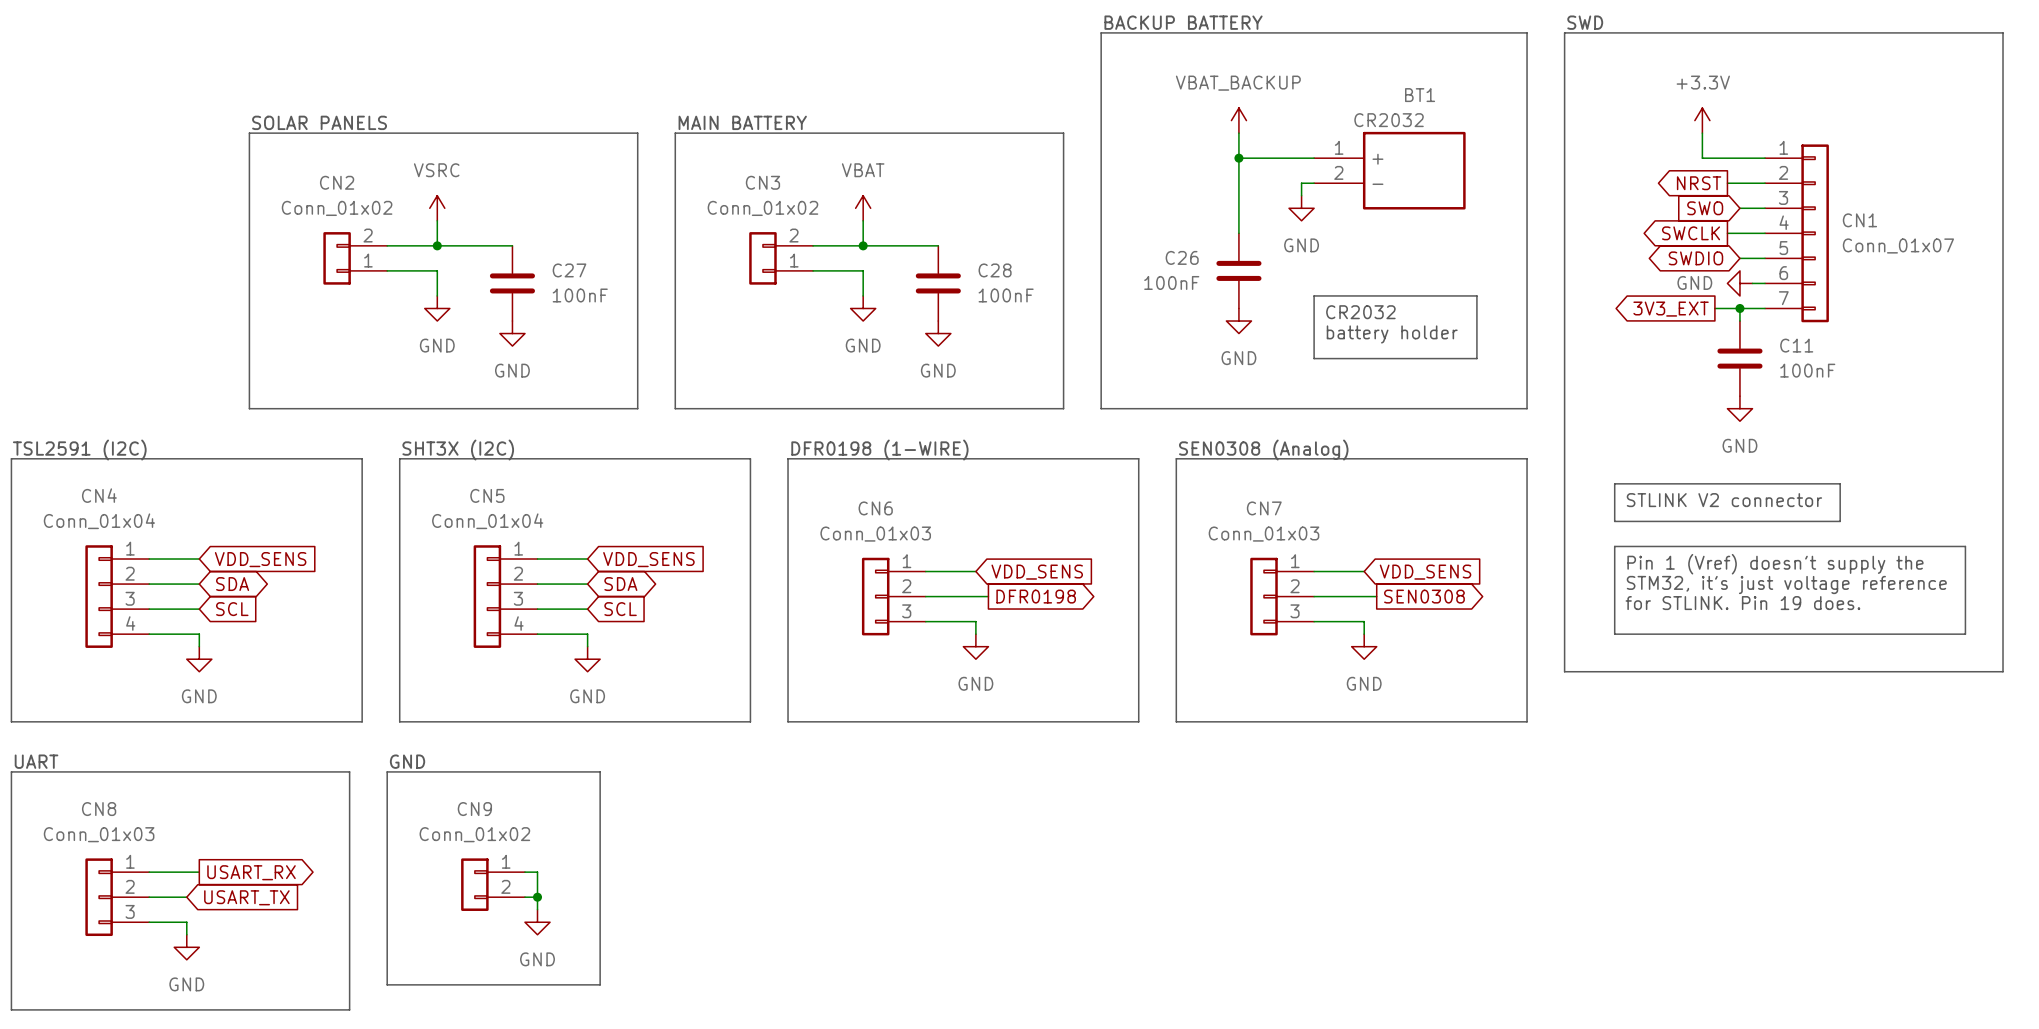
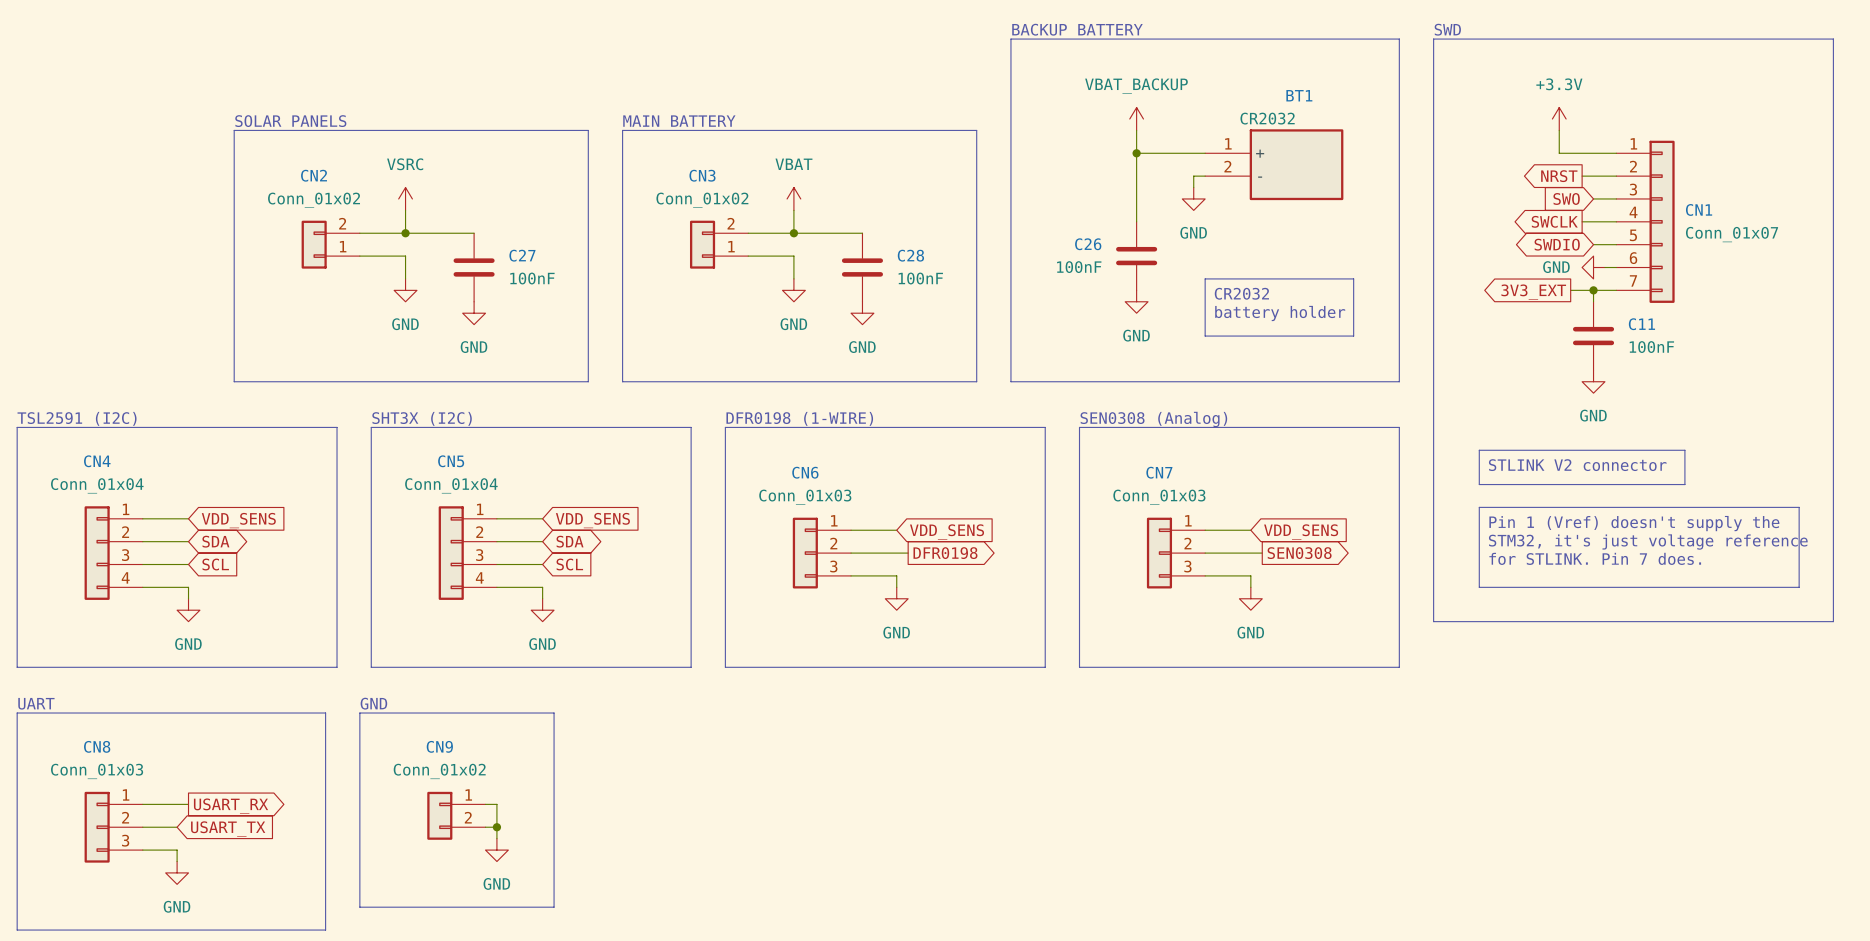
text: for STLINK. Pin 19 does. (1742, 603) -> for STLINK. Pin 7 does. (1595, 558)

